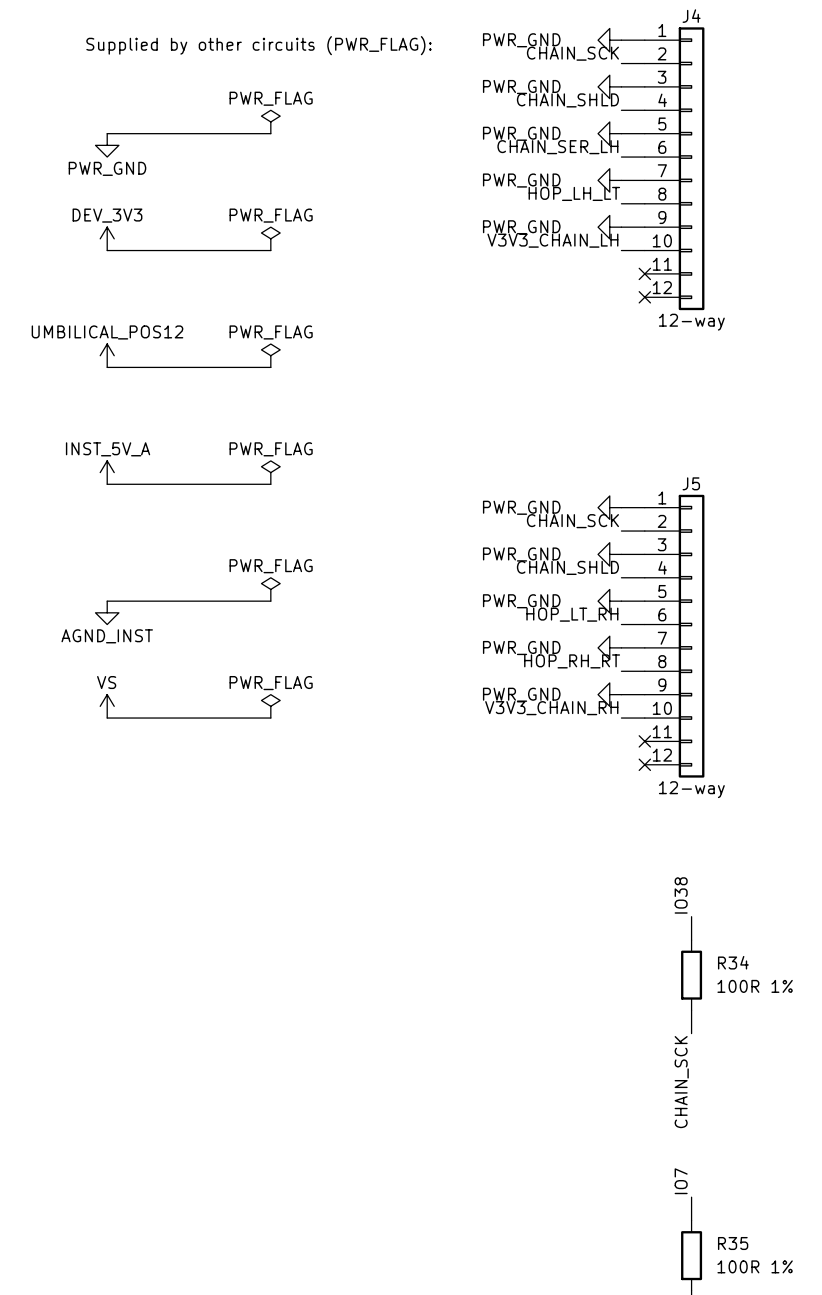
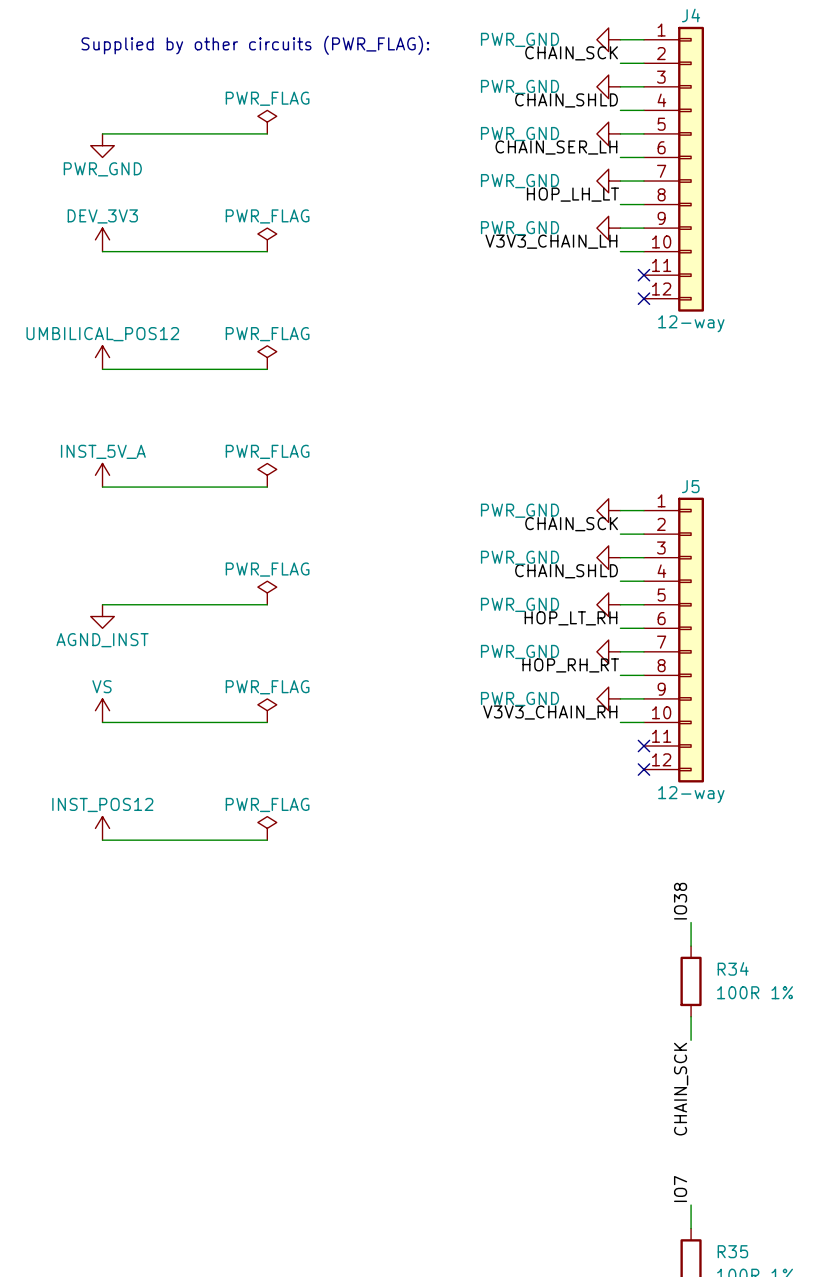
power symbol: none -> INST_POS12 (102, 828)
power symbol: none -> PWR_FLAG (267, 828)
wire: none -> (102, 840) (267, 840)

